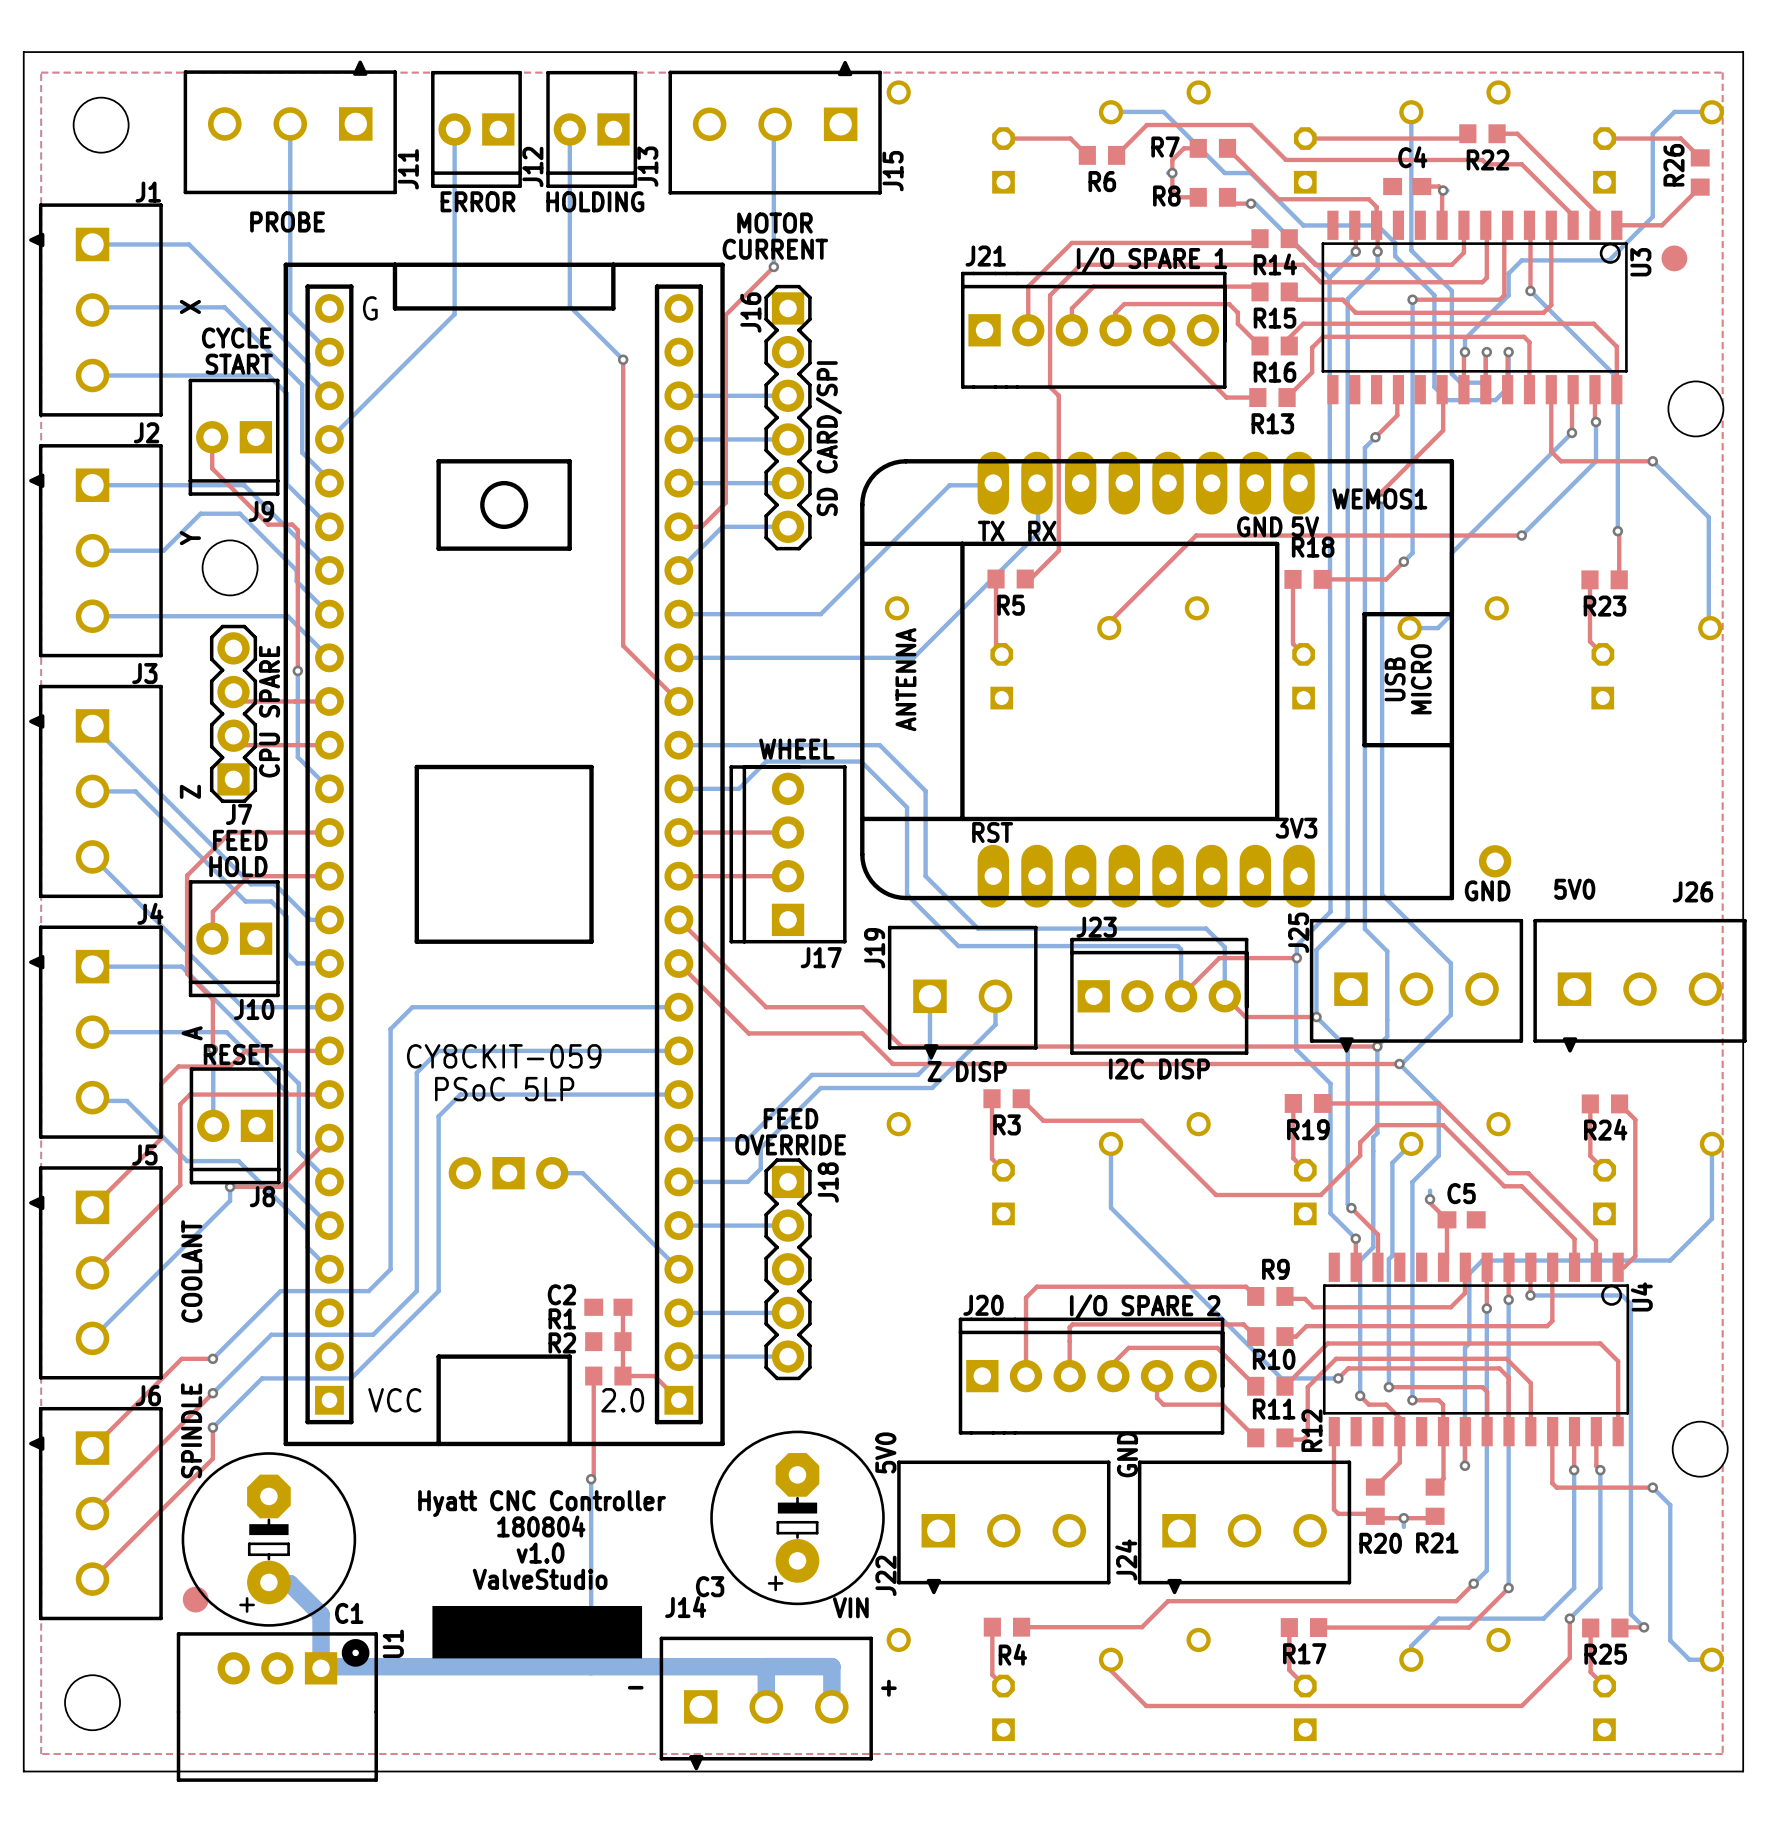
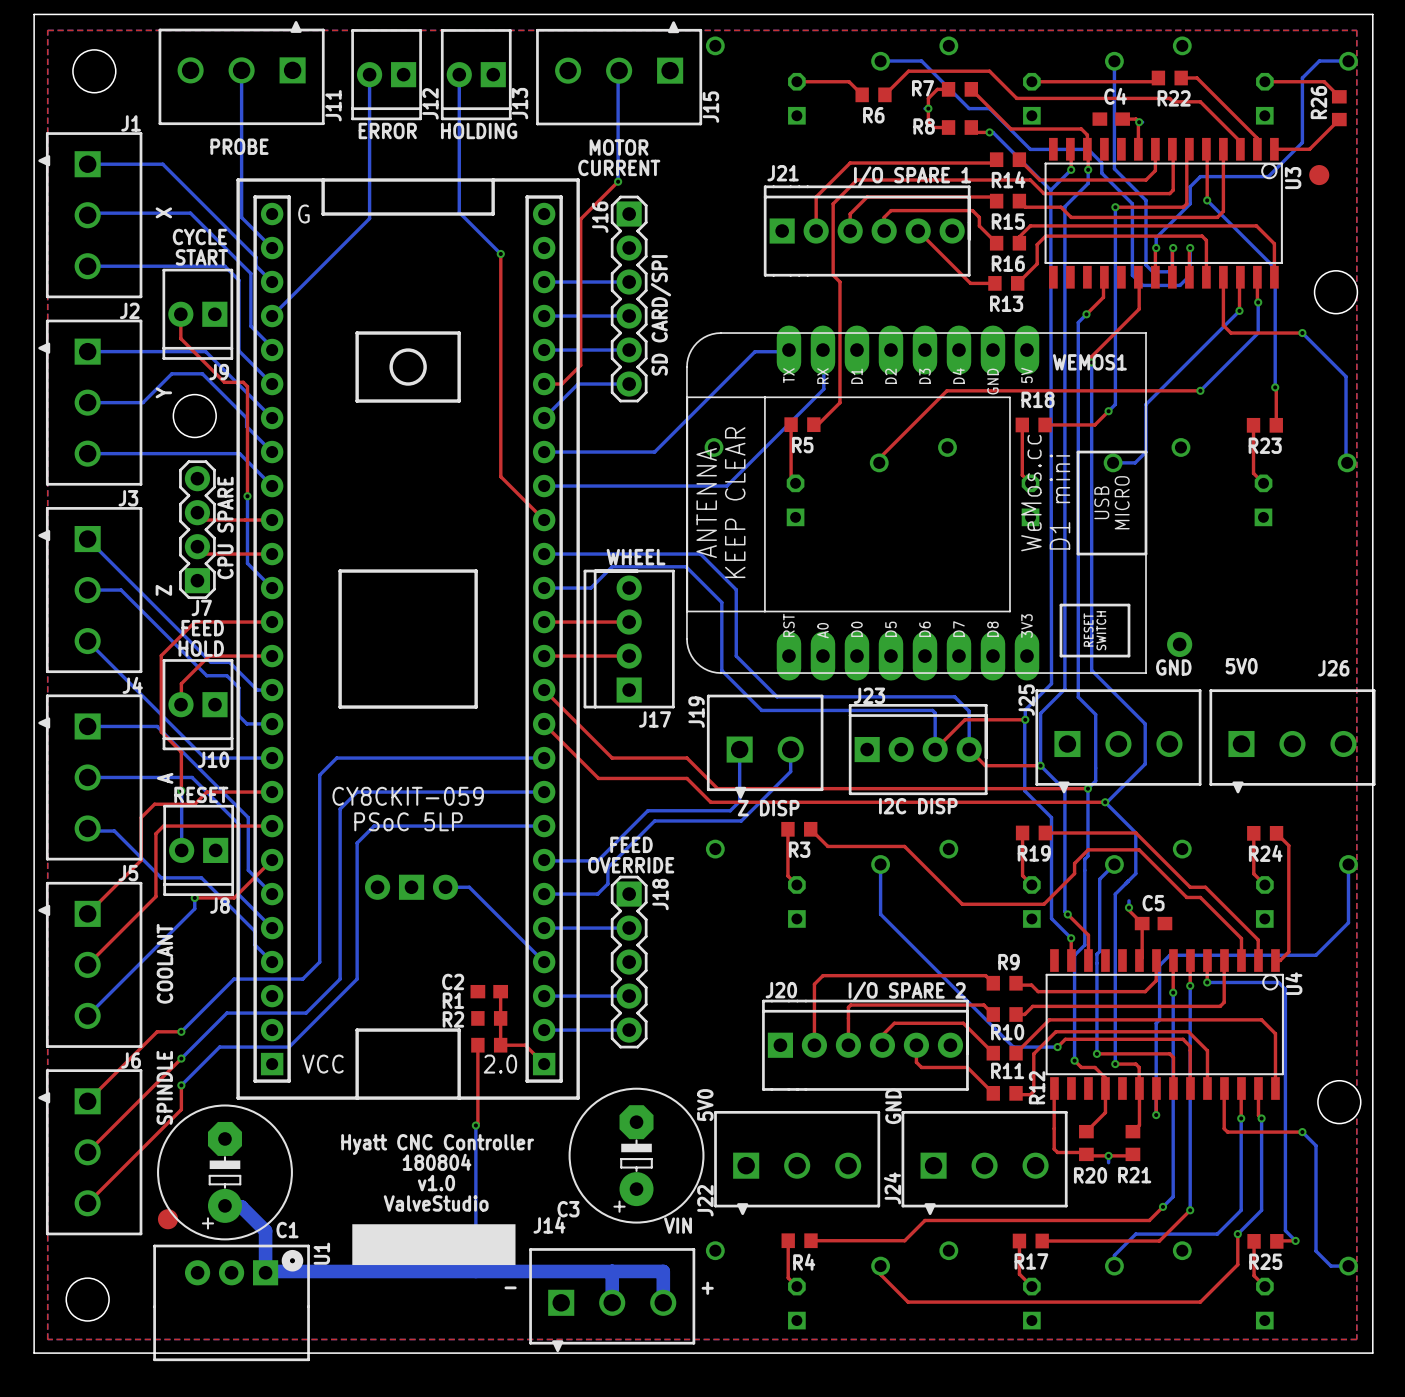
WEMOS1 footprint: [860, 451, 1455, 908] -> [686, 325, 1148, 681]

